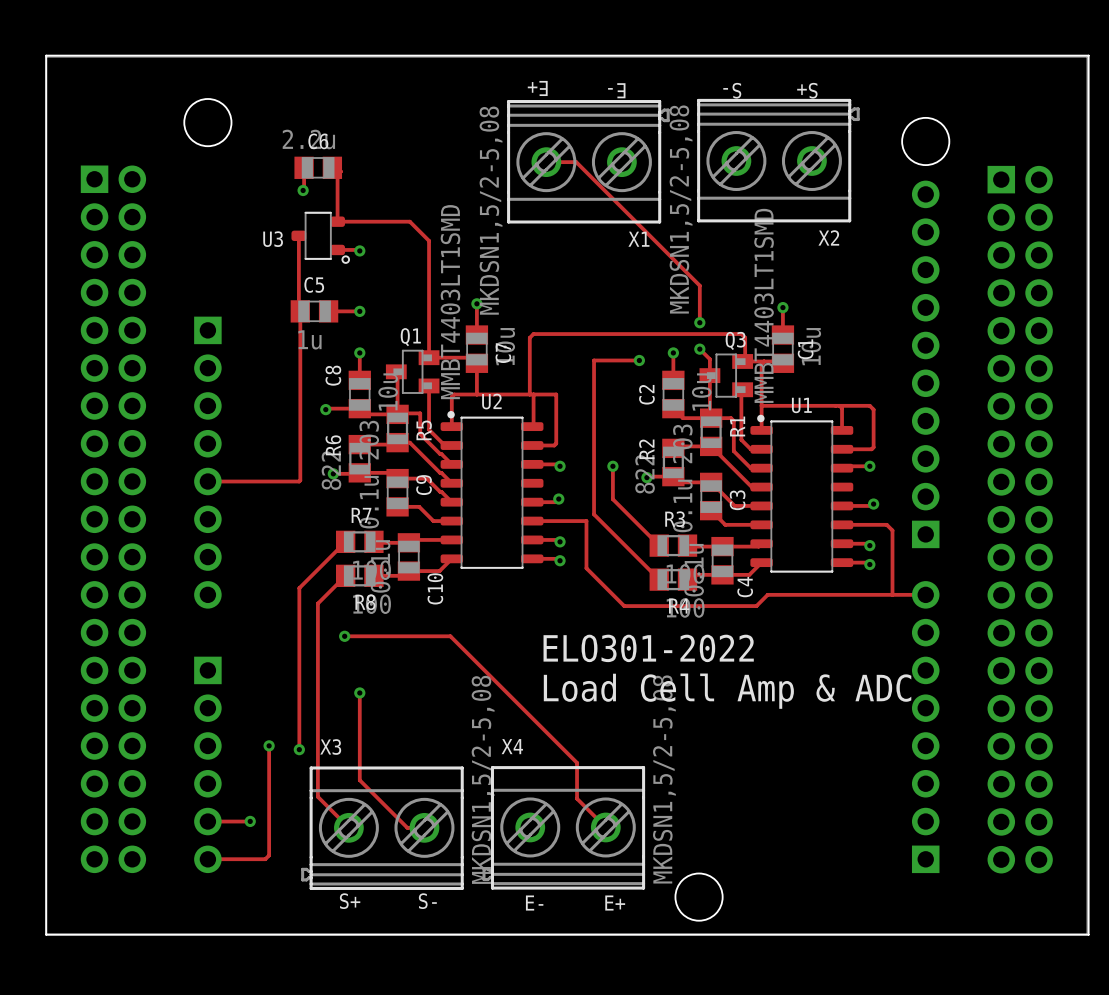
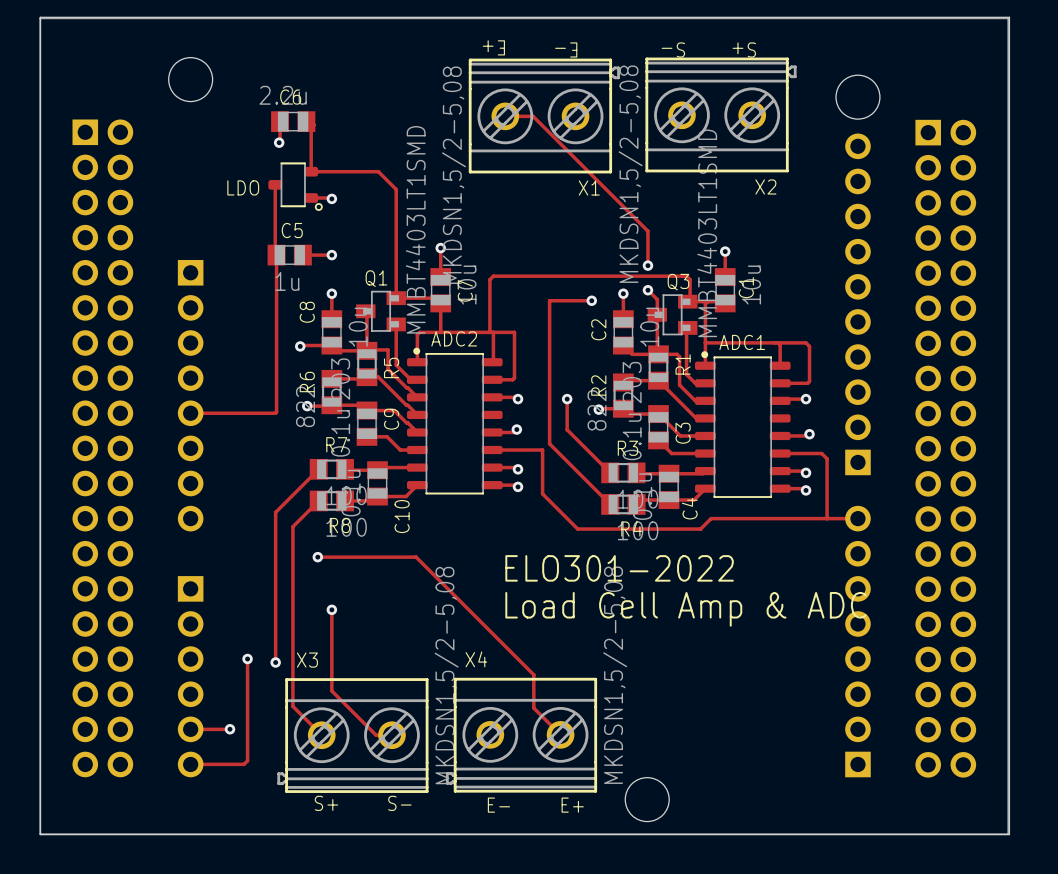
U3 name: U3 (273, 239) -> LDO (243, 187)
U2 name: U2 (491, 401) -> ADC2 (454, 338)
U1 name: U1 (801, 405) -> ADC1 (742, 342)

